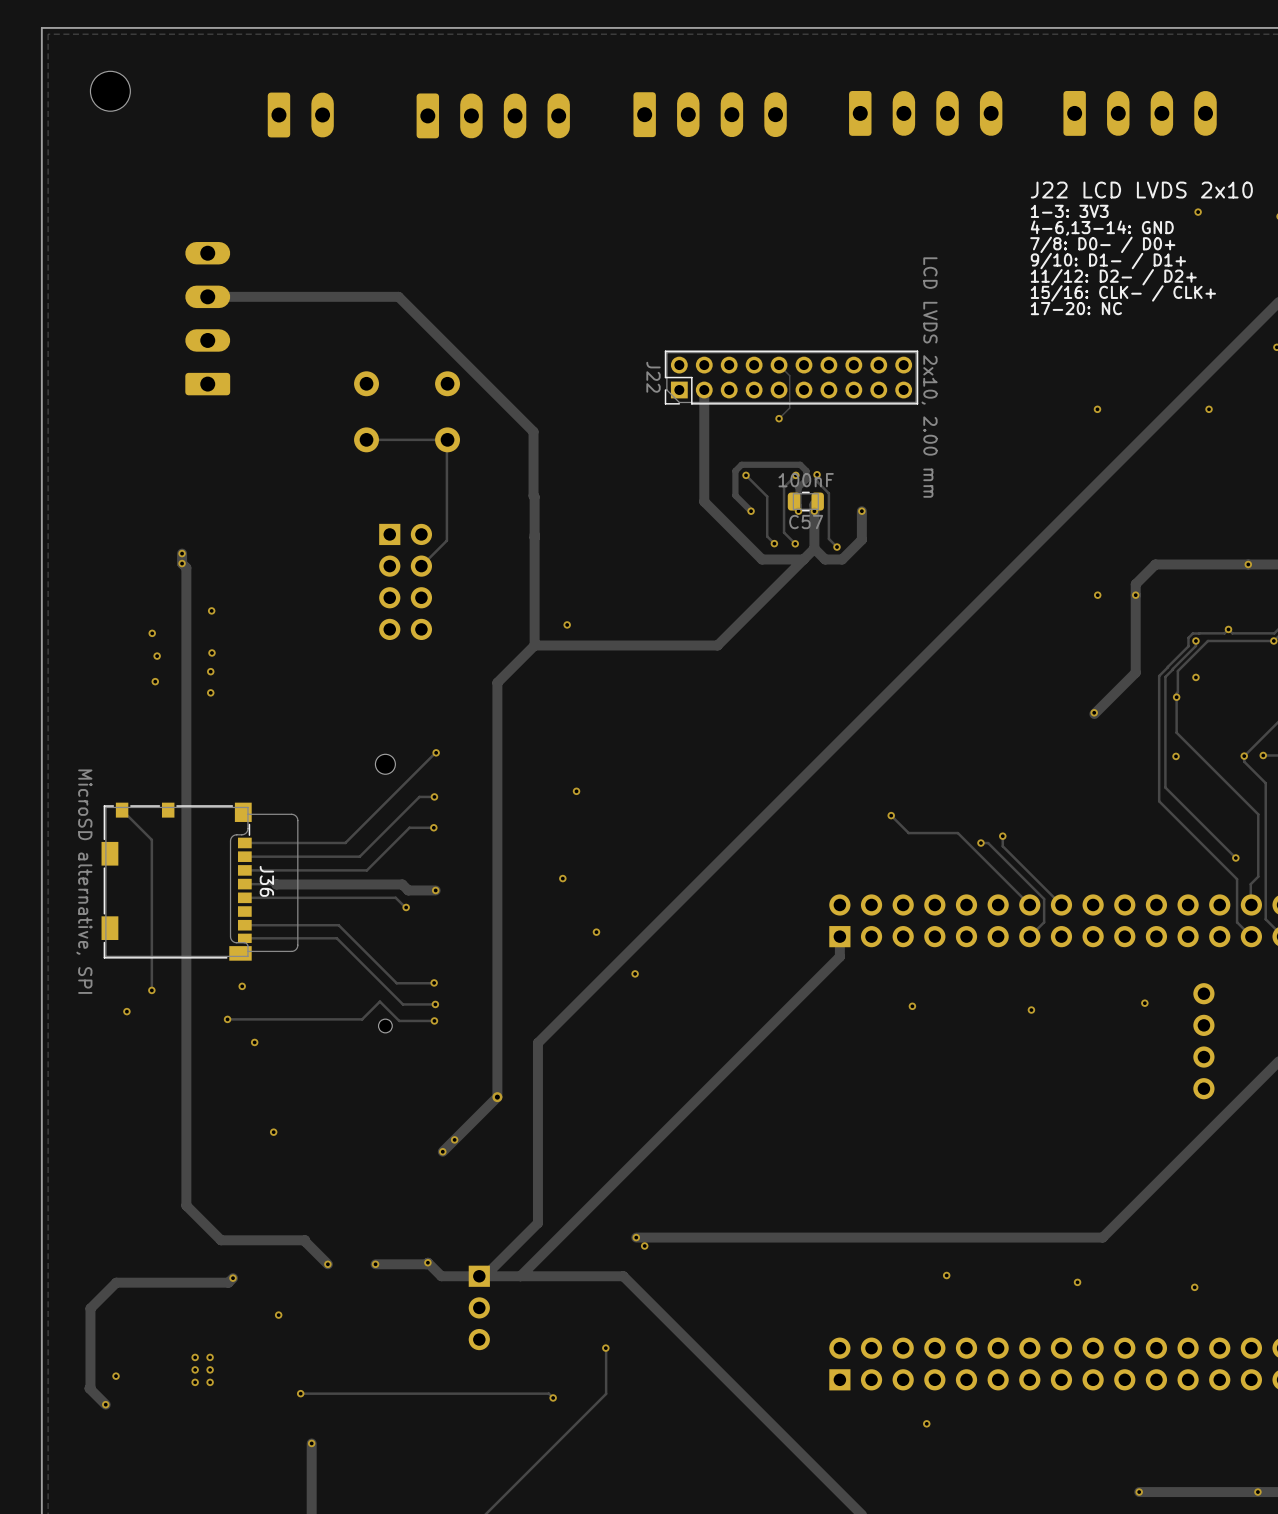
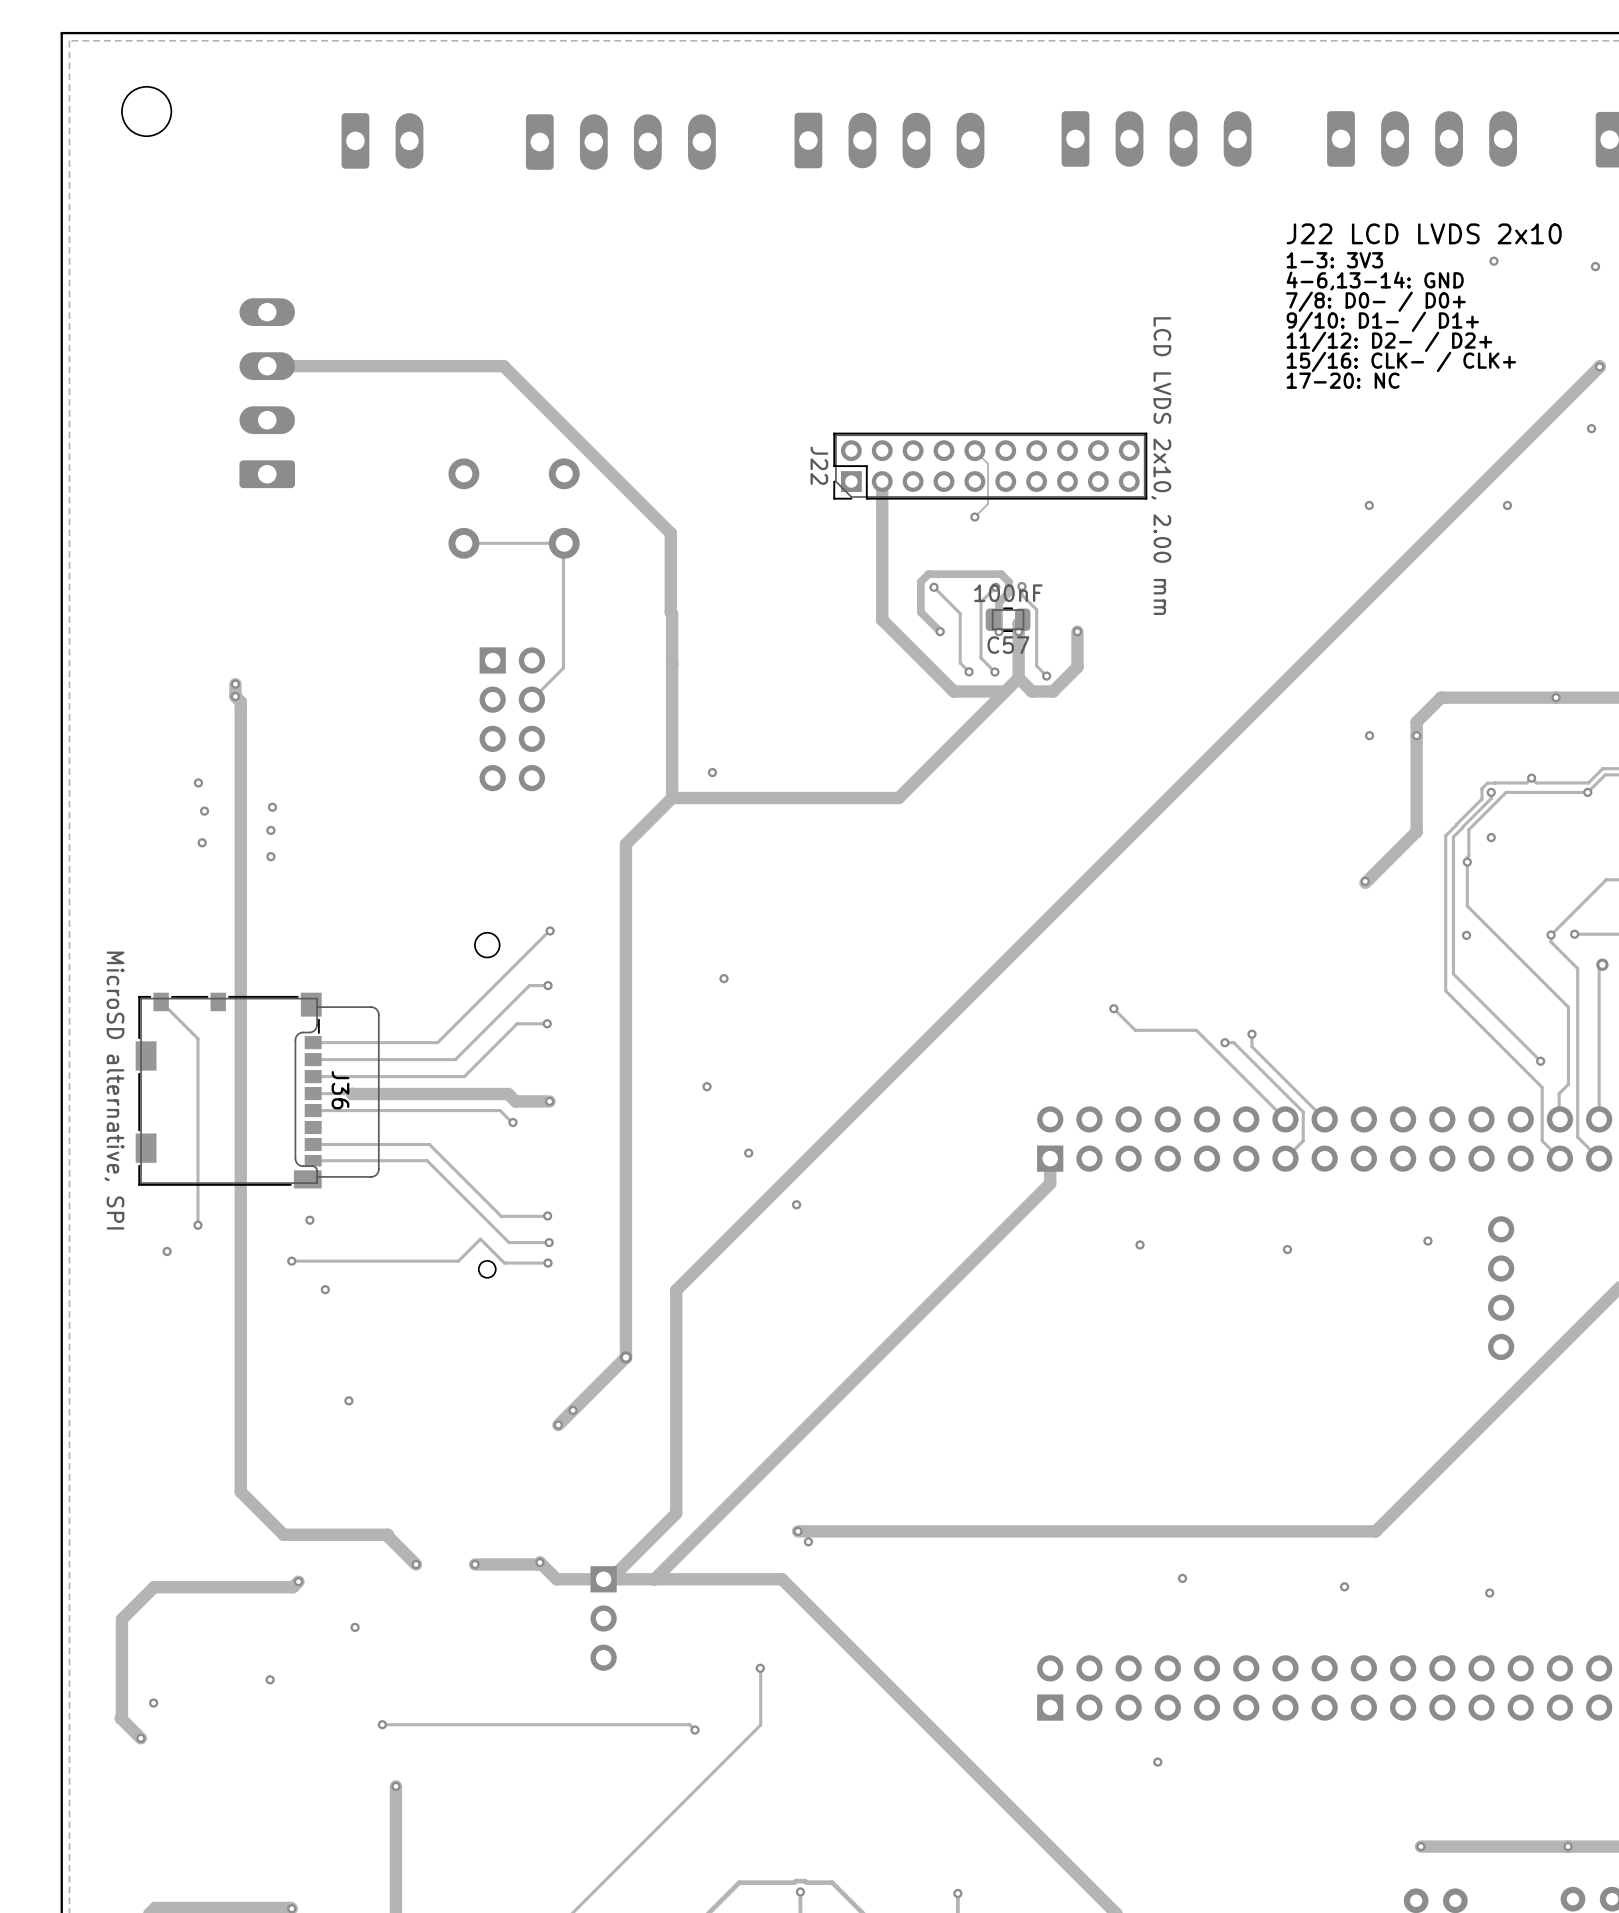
via: (211, 610) -> none
via: (195, 1357) -> none
via: (195, 1369) -> none
via: (210, 1369) -> none
via: (195, 1382) -> none
via: (210, 1382) -> none

